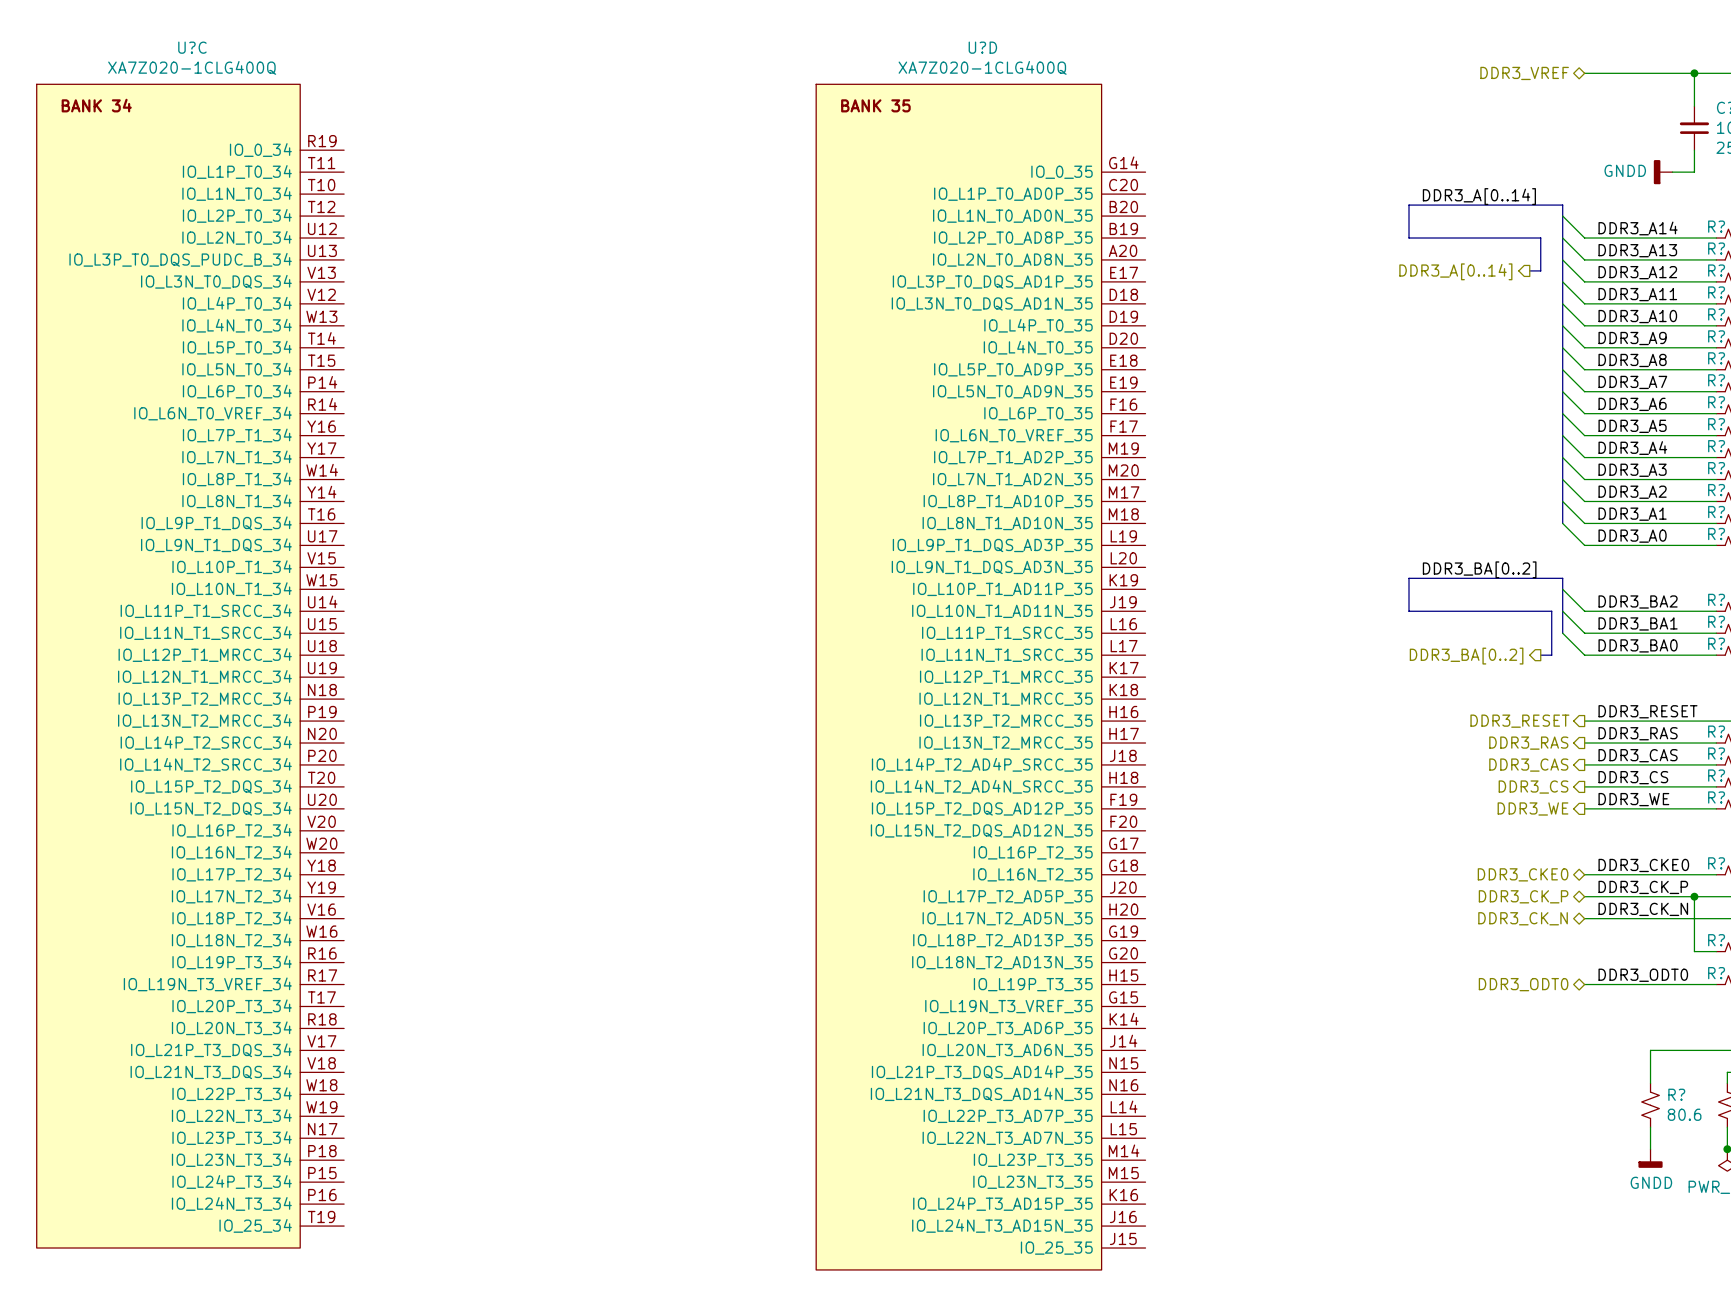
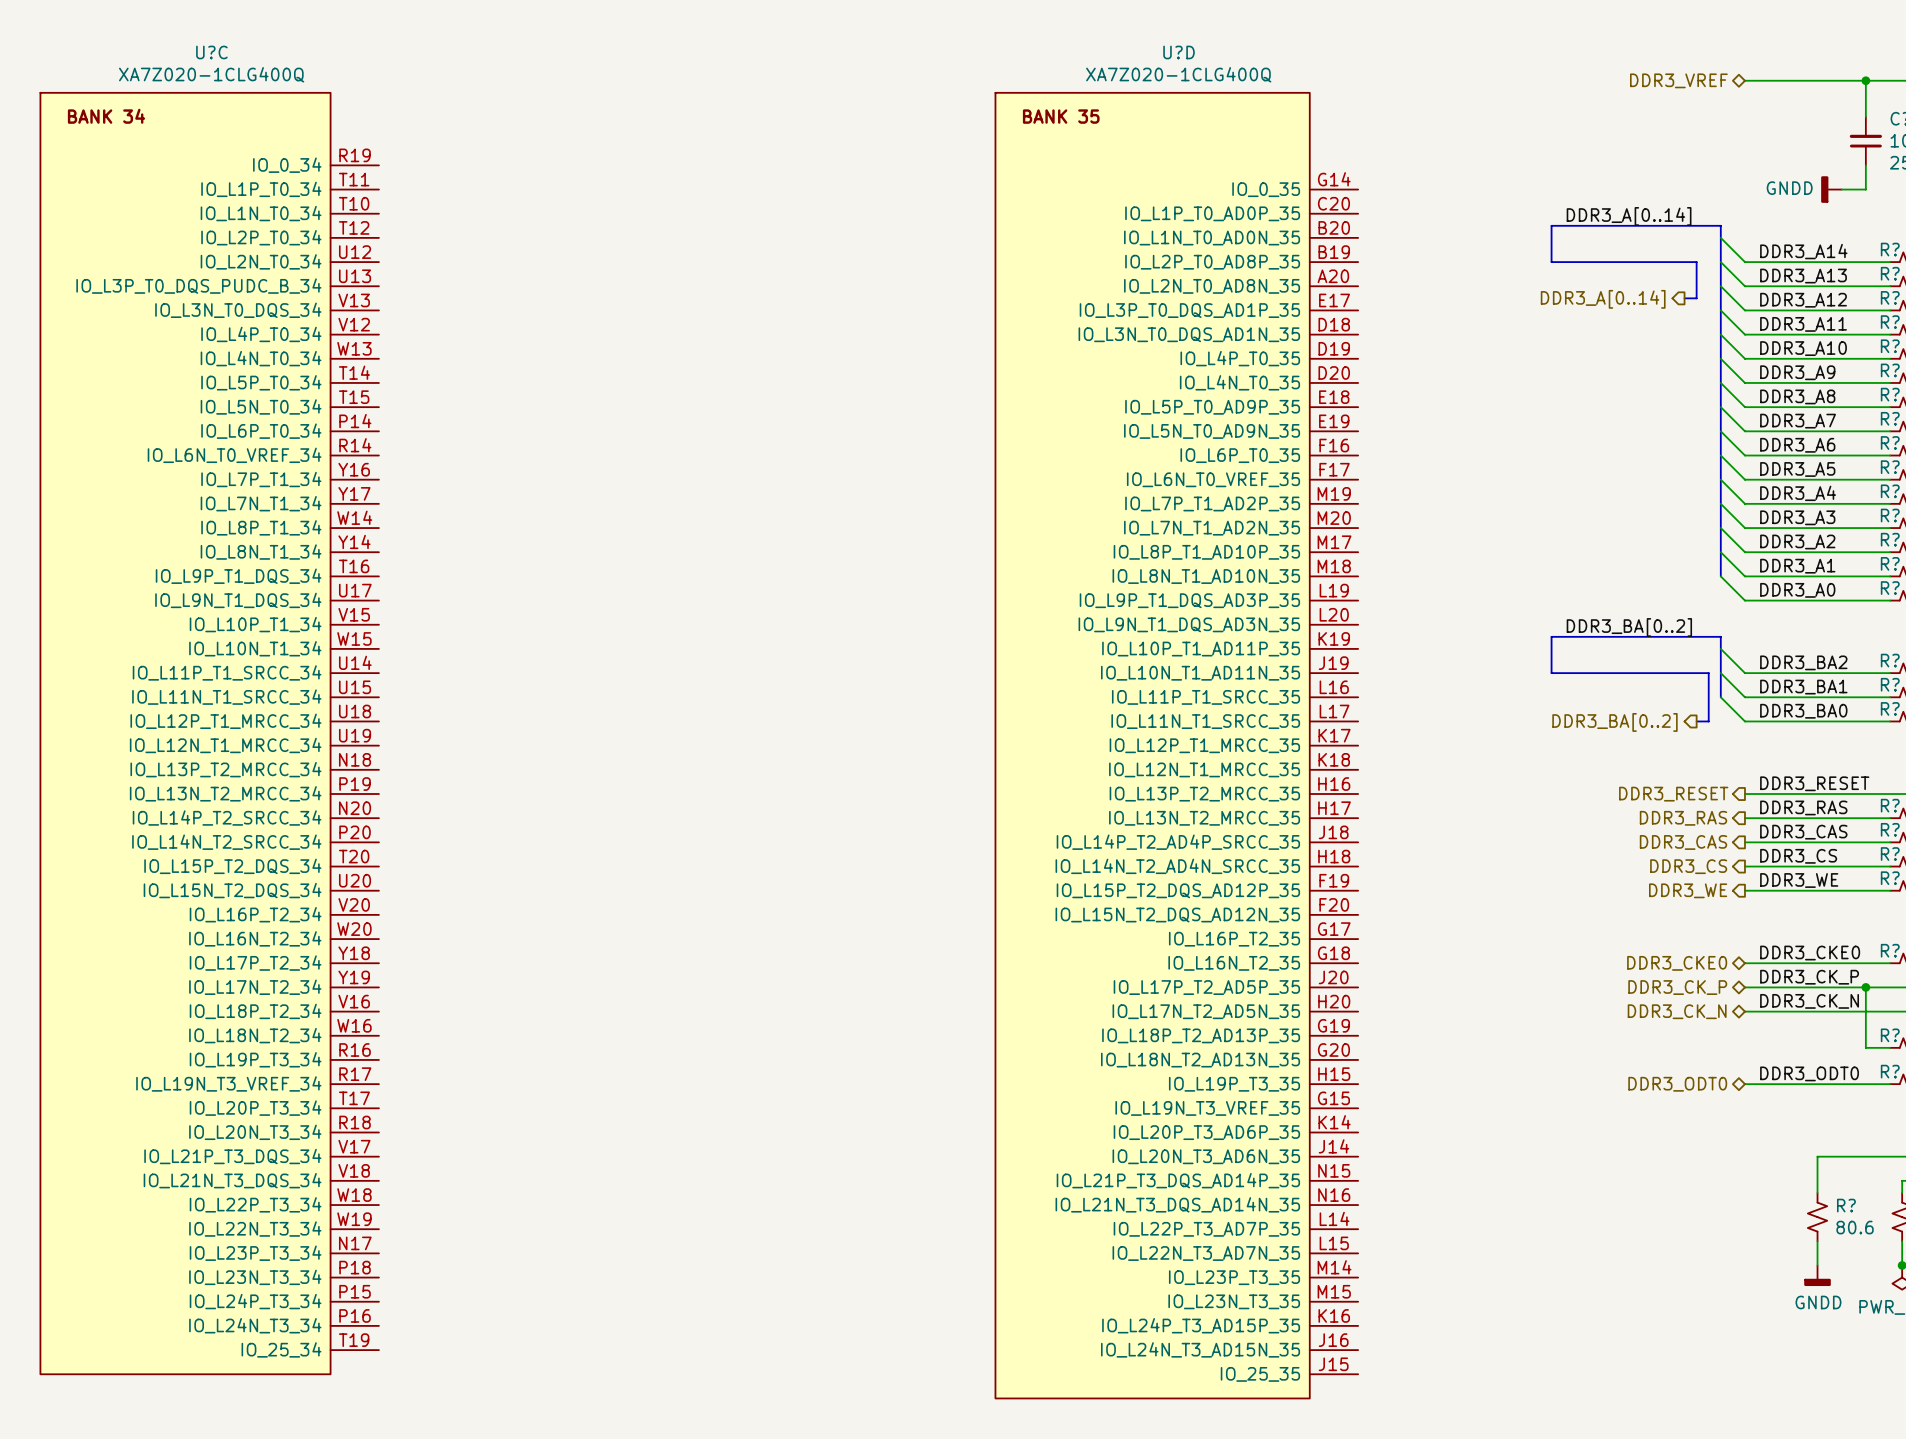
U?D position: (980, 677) -> (1176, 745)

